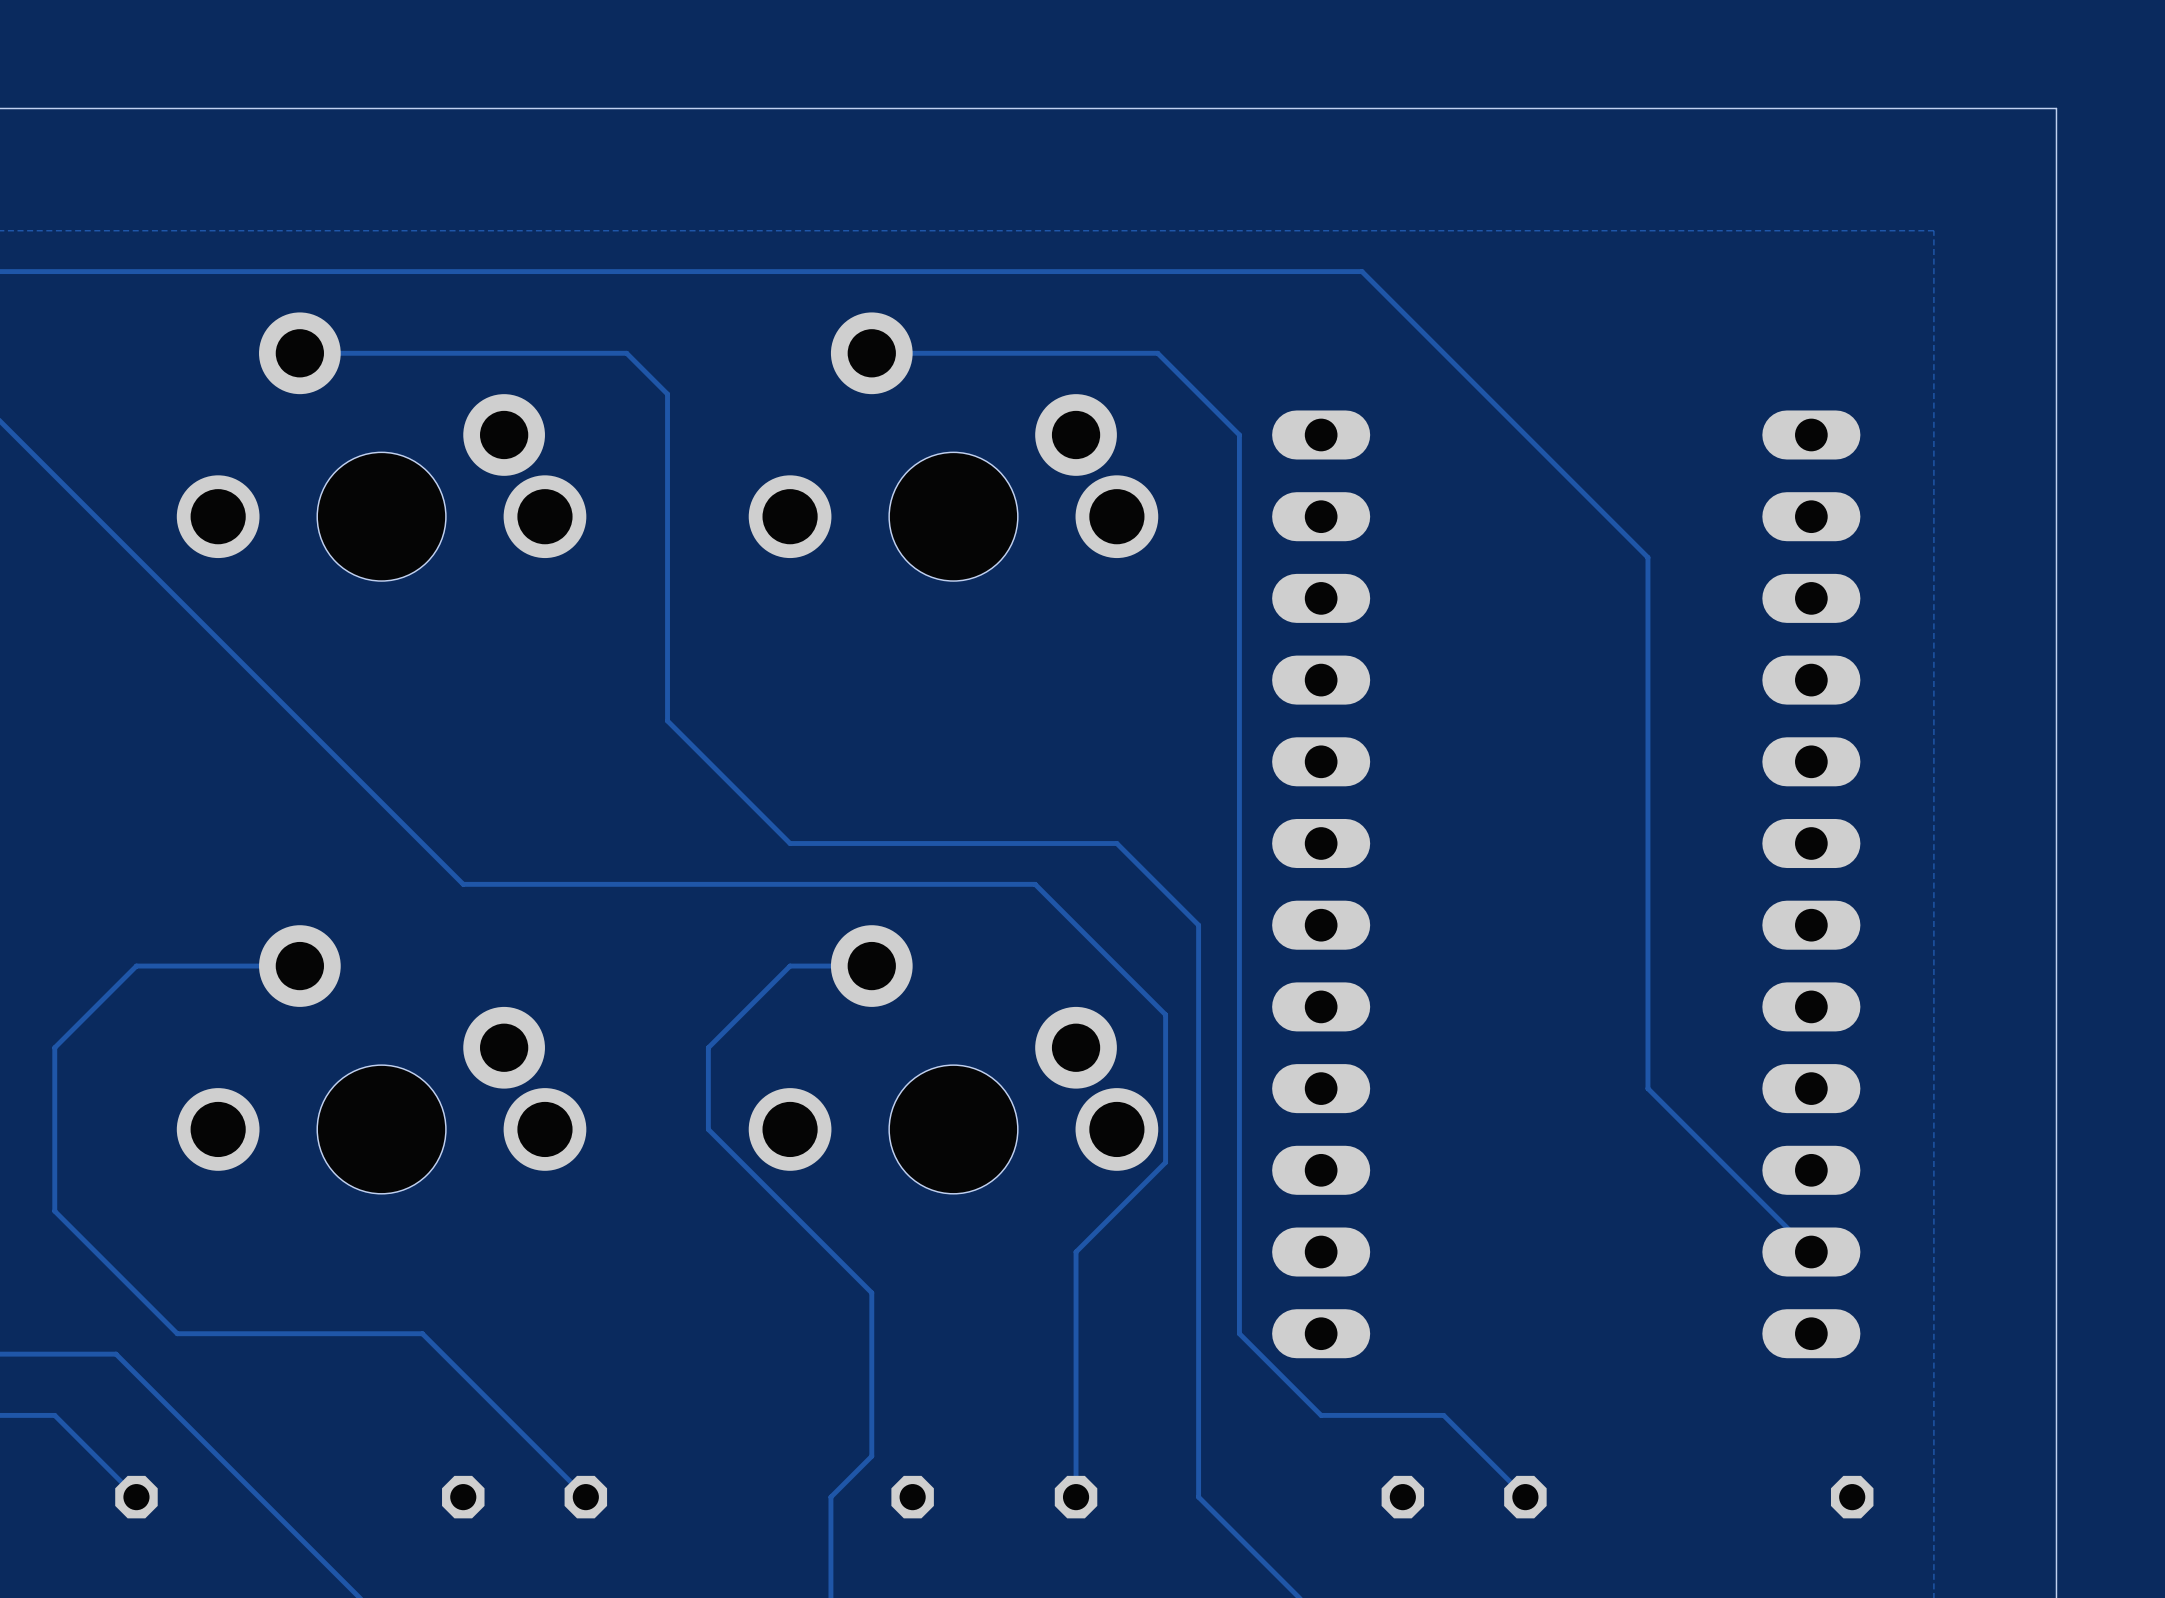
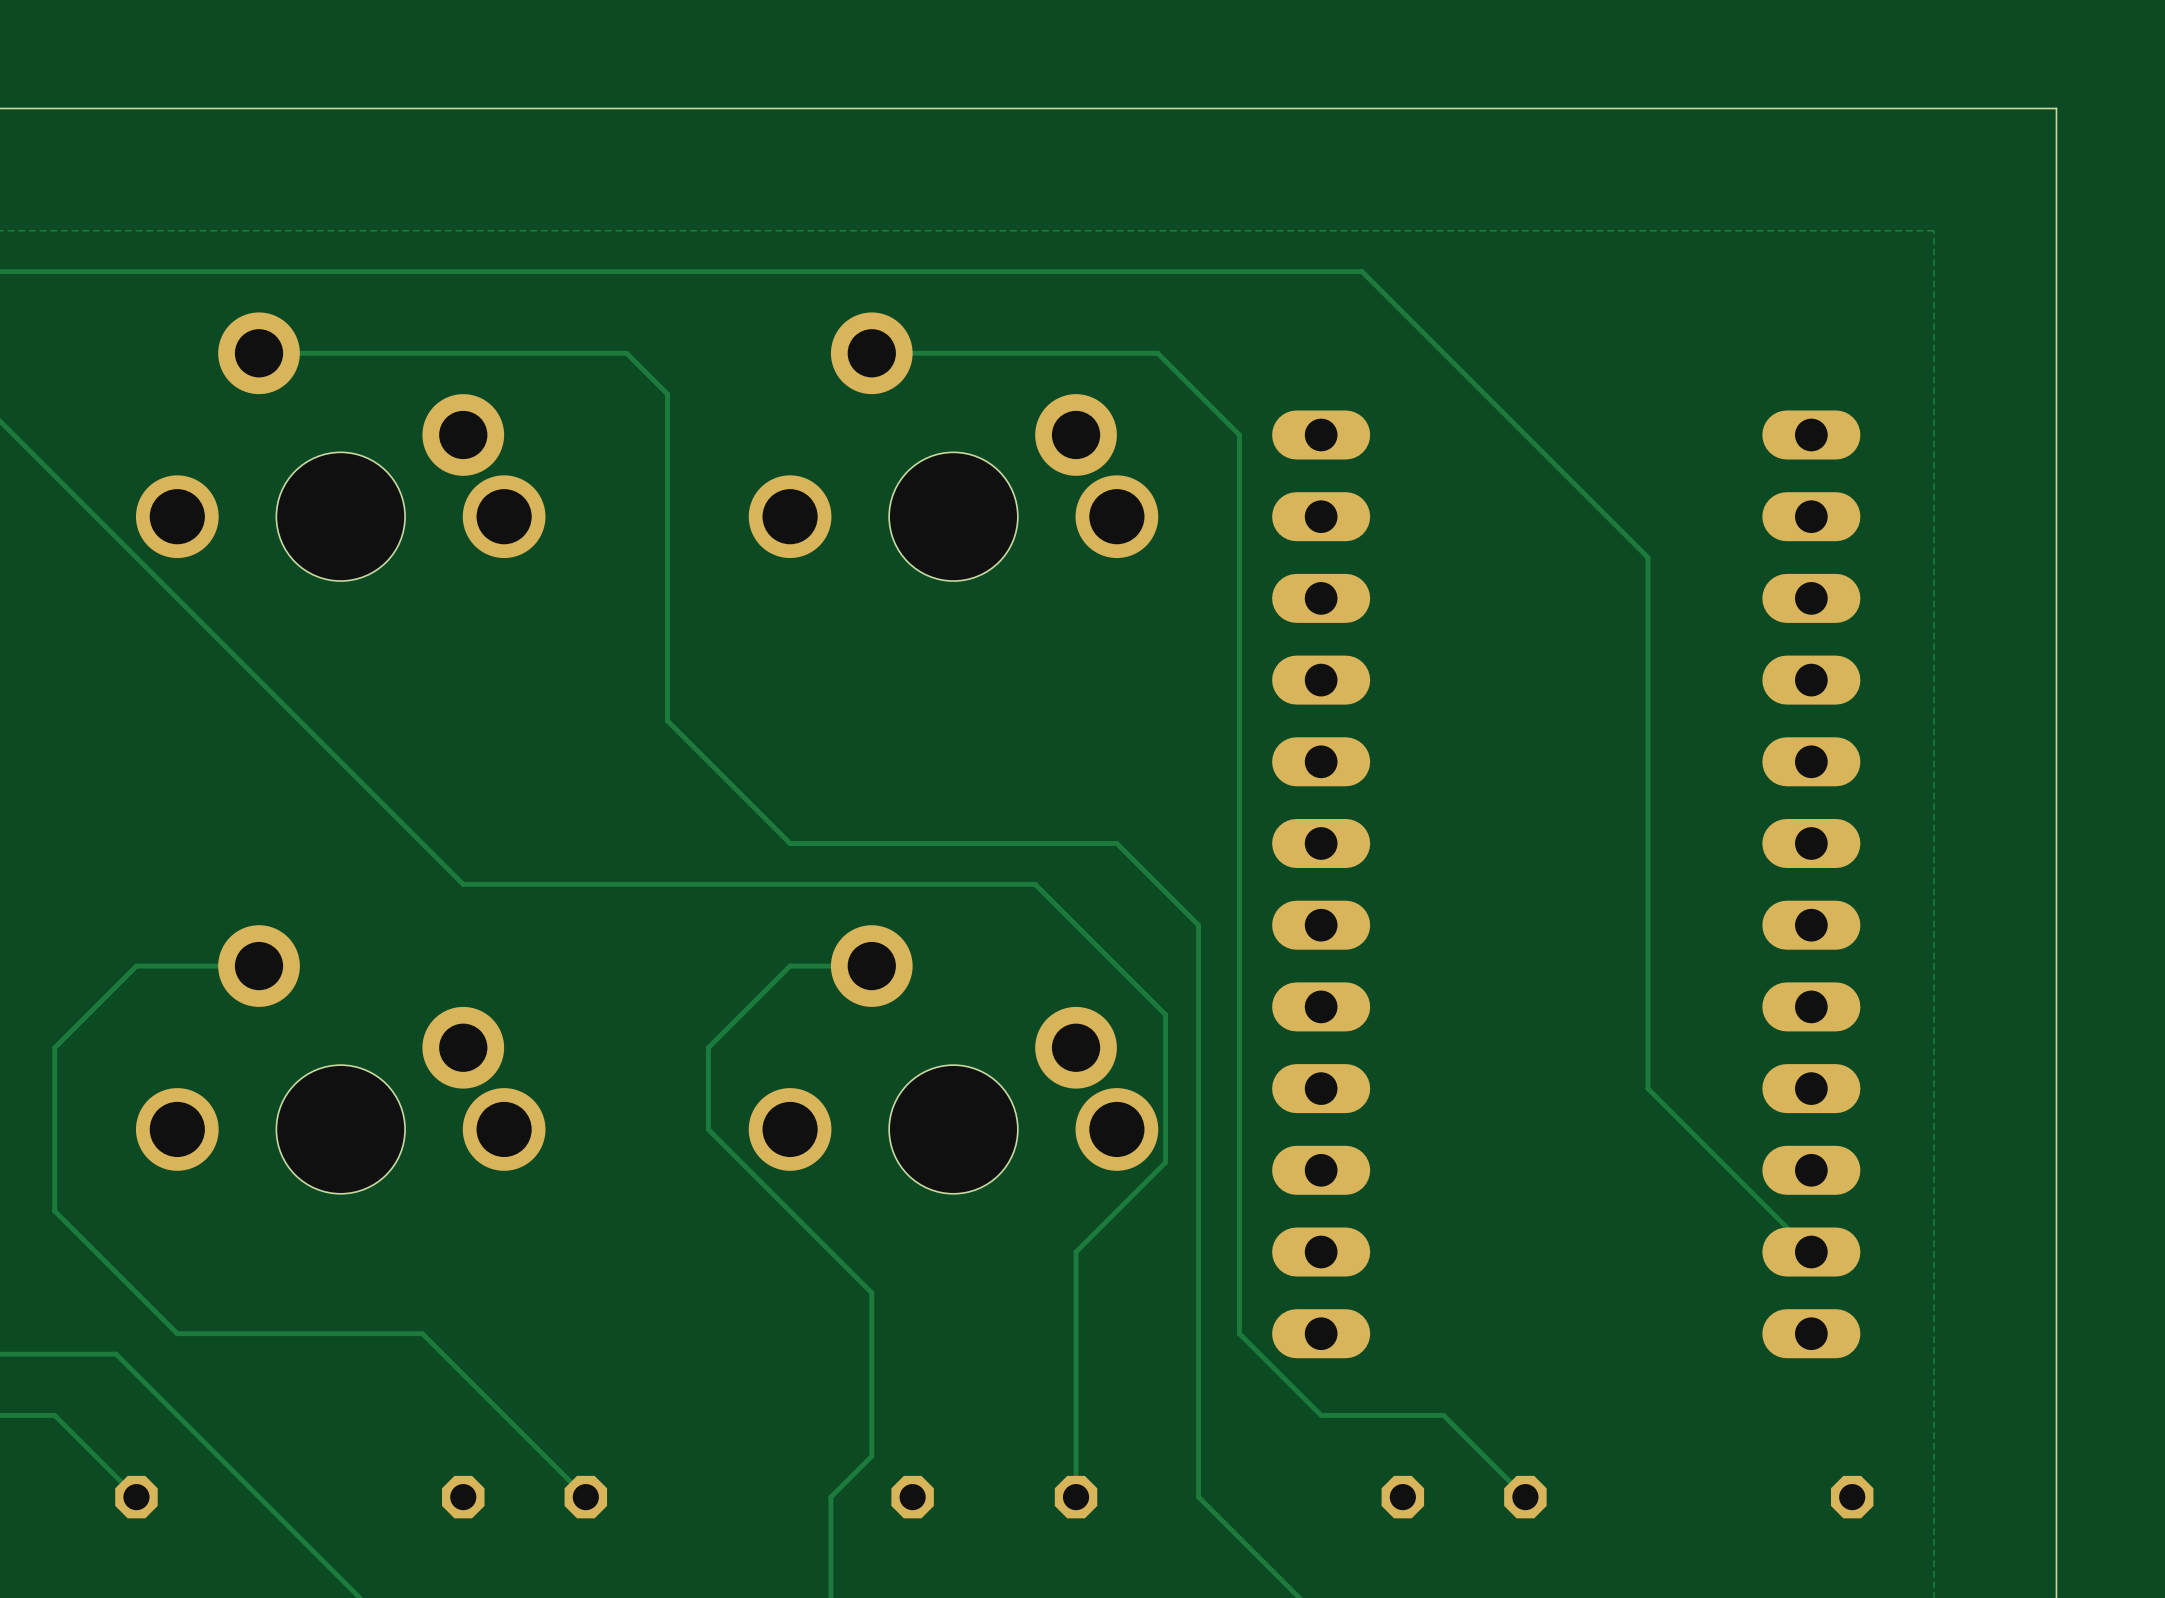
part position: (381, 446) -> (340, 446)
part position: (381, 1059) -> (340, 1059)

